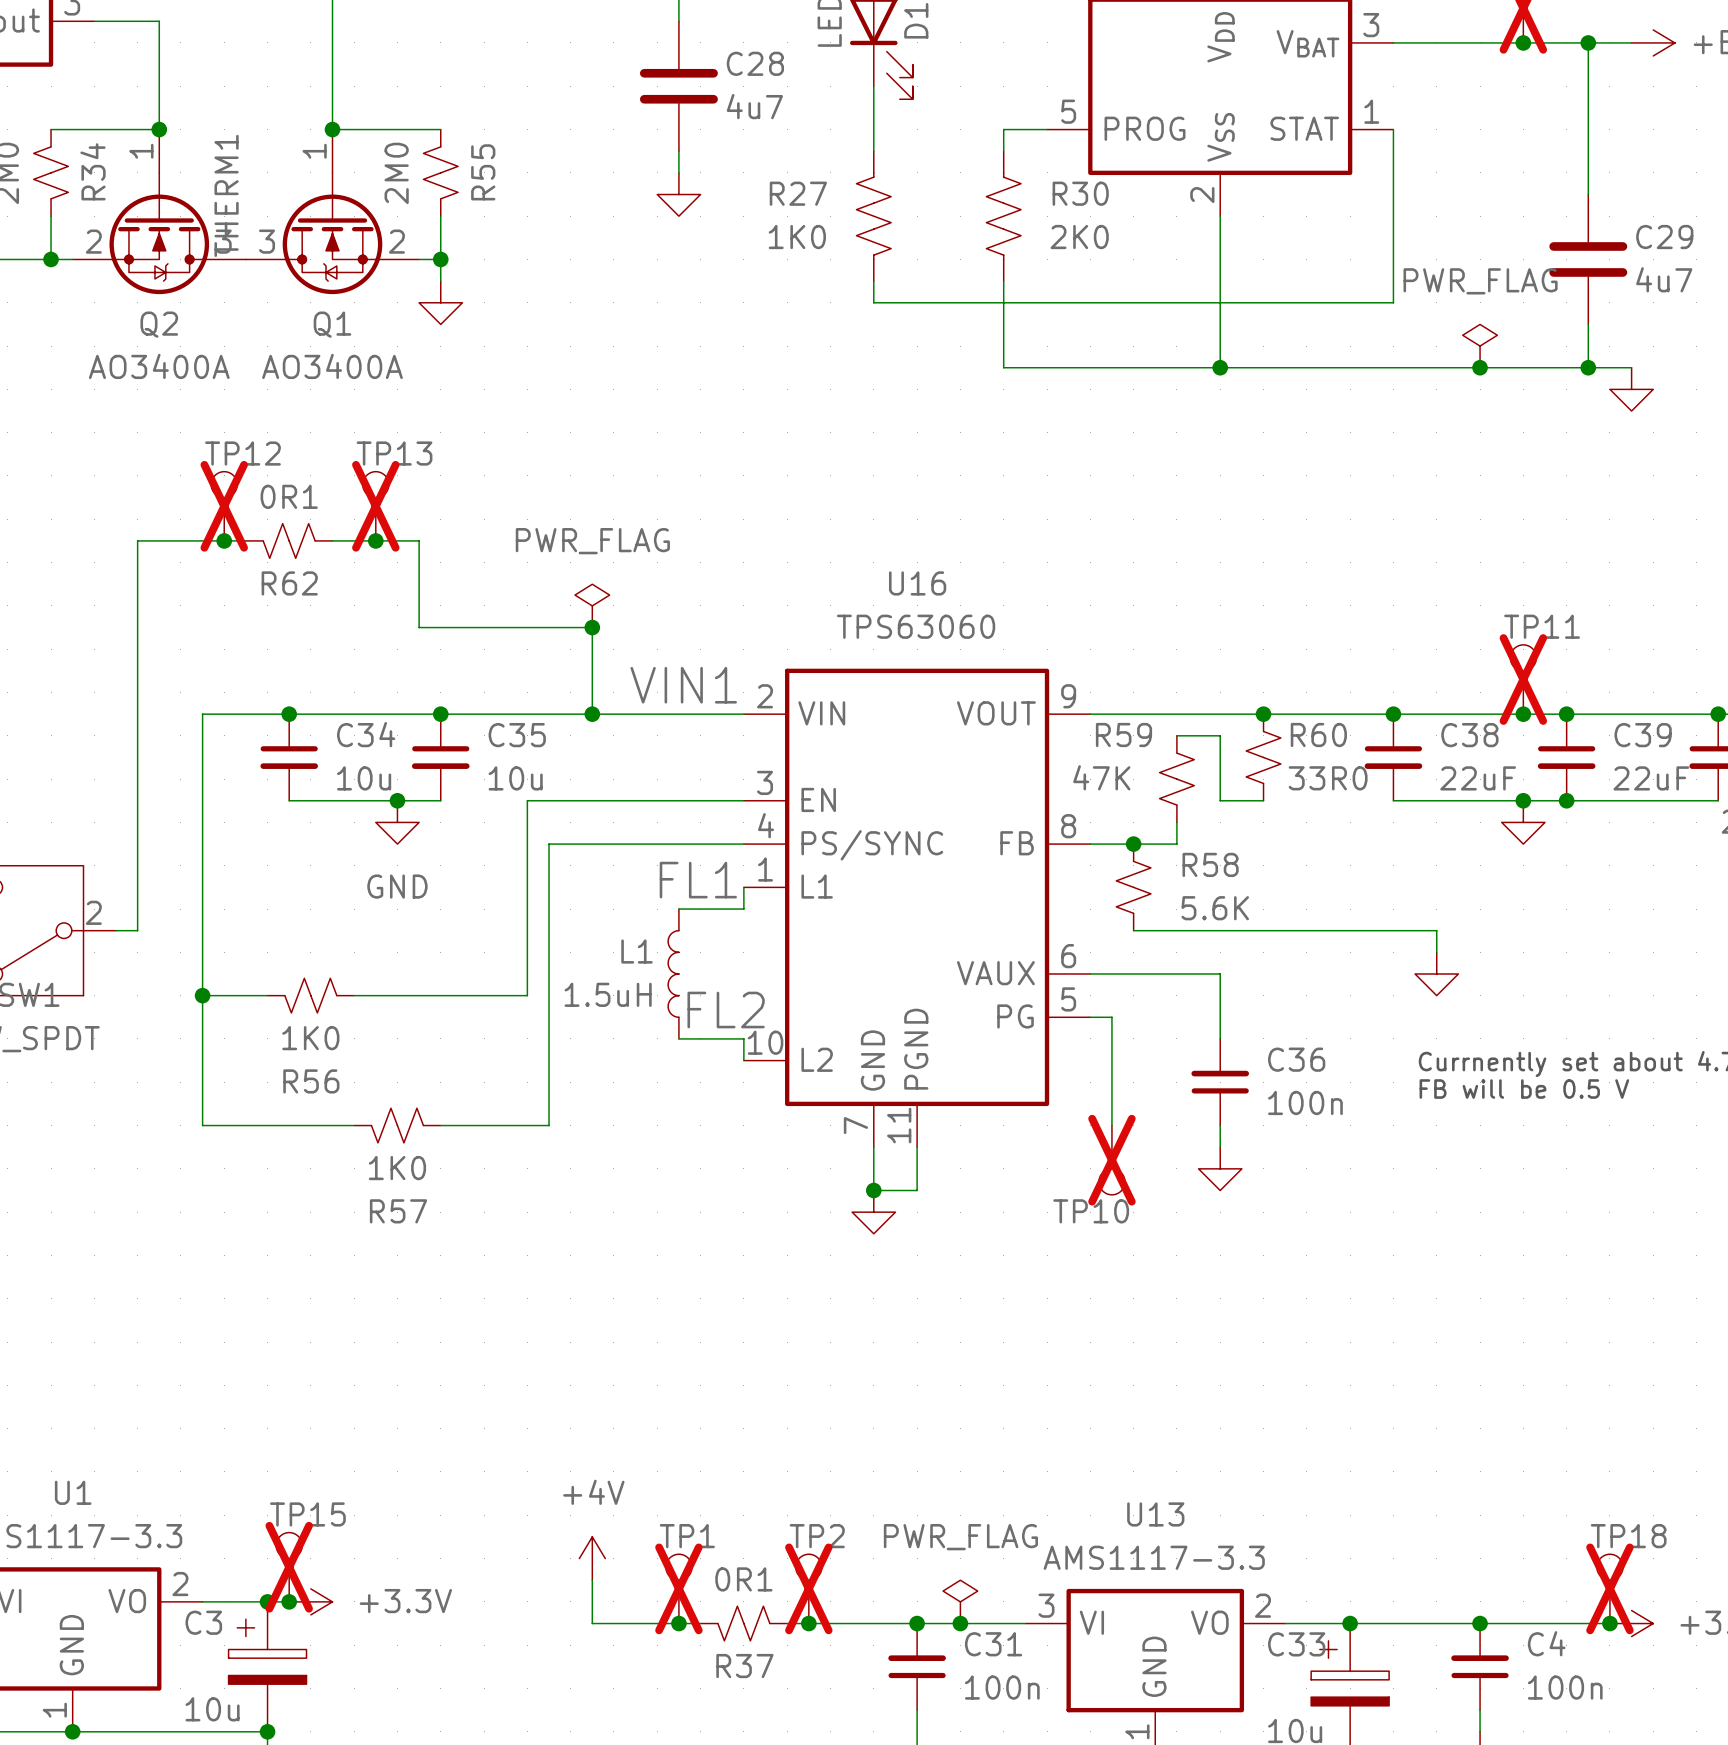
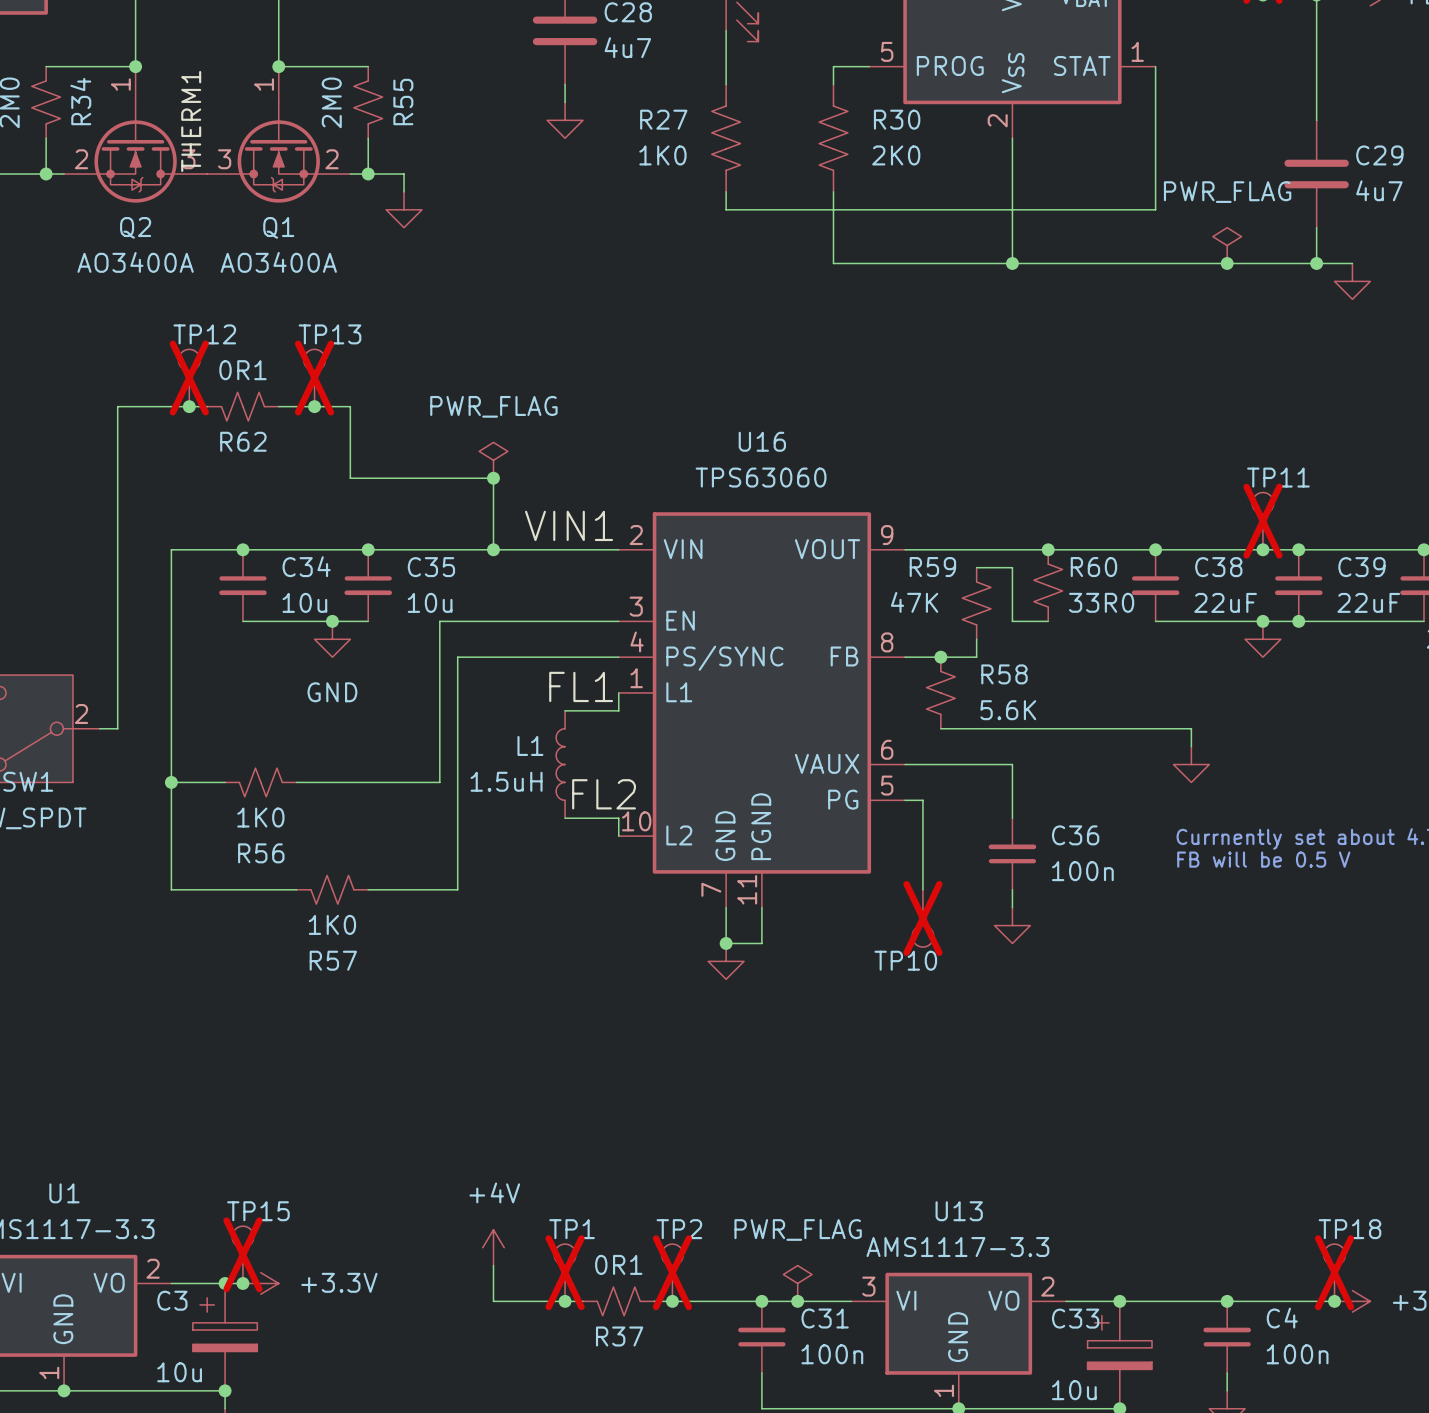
wire: (440, 259) (440, 281) -> (368, 174) (404, 174) (404, 191)
power symbol position: (440, 302) -> (404, 209)

